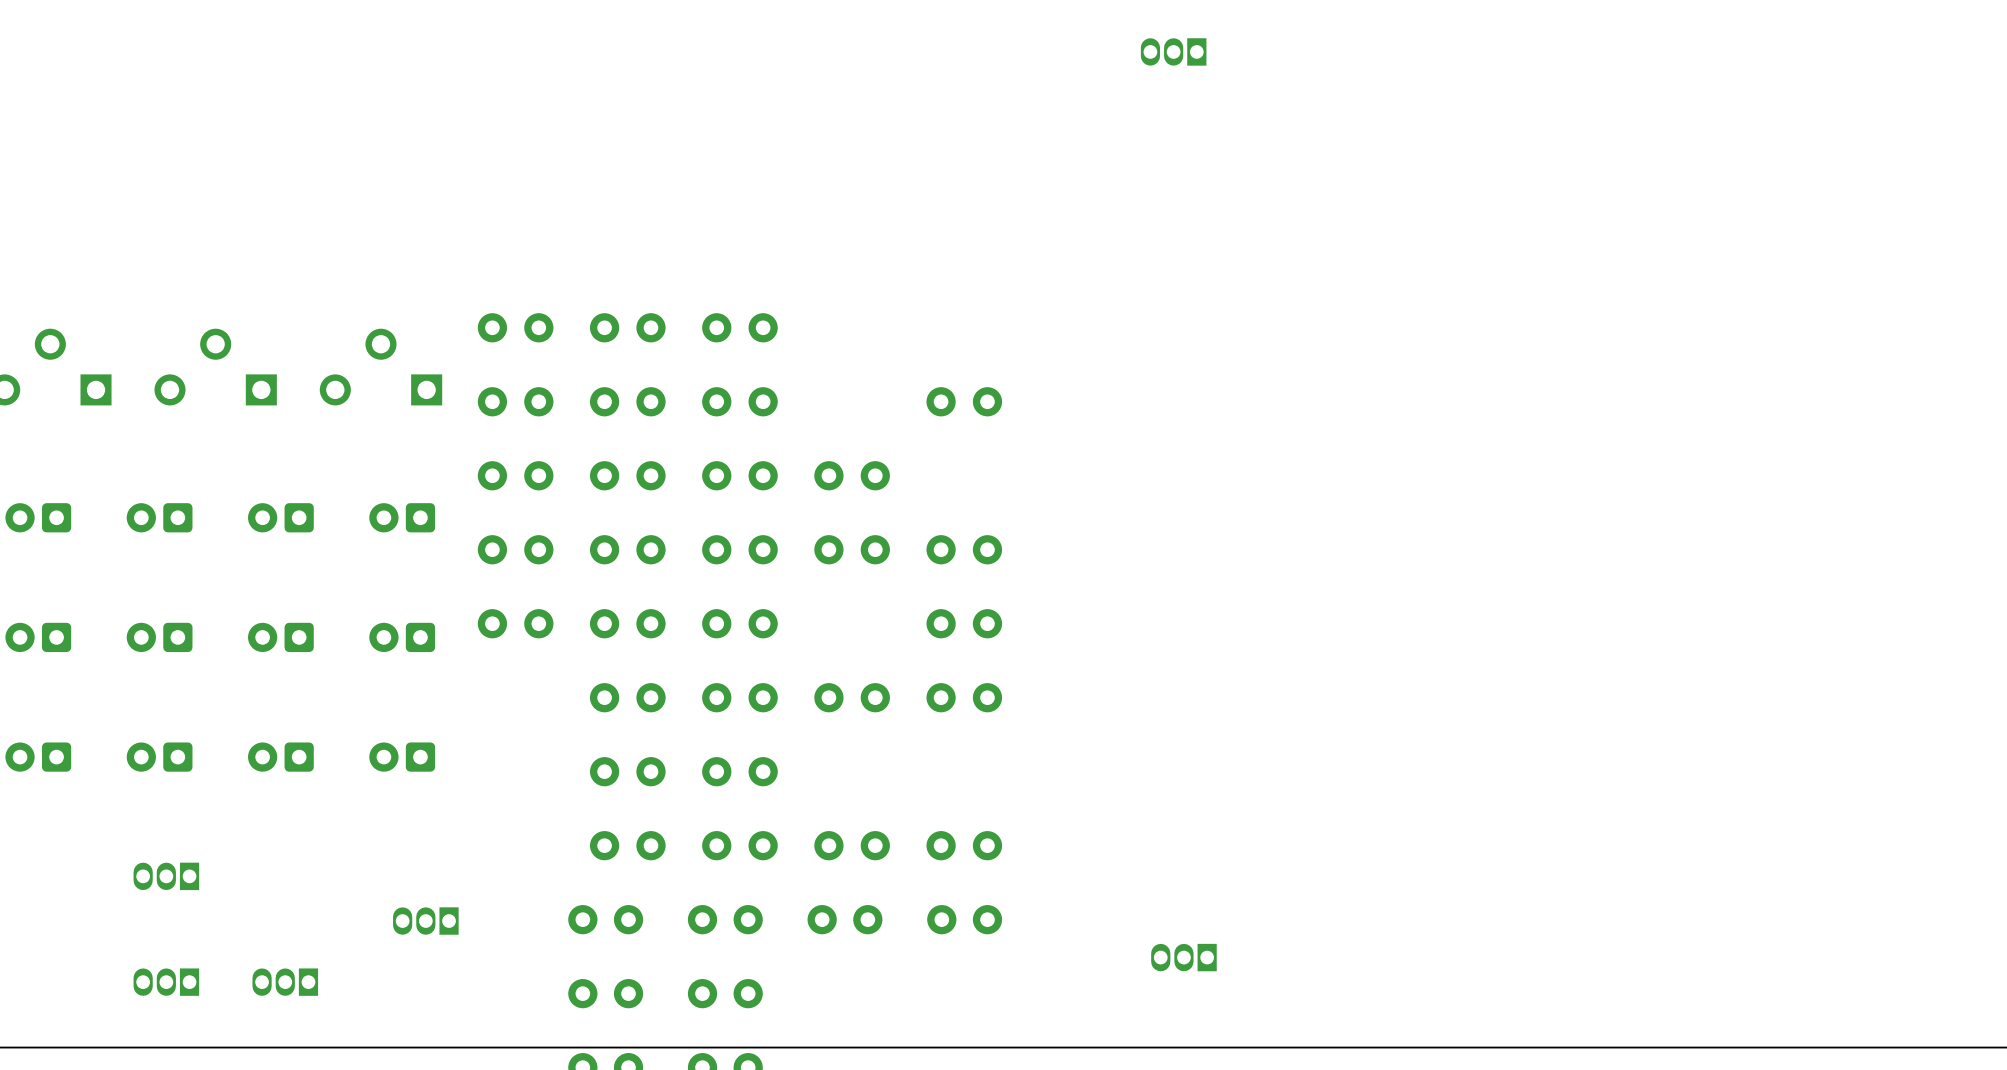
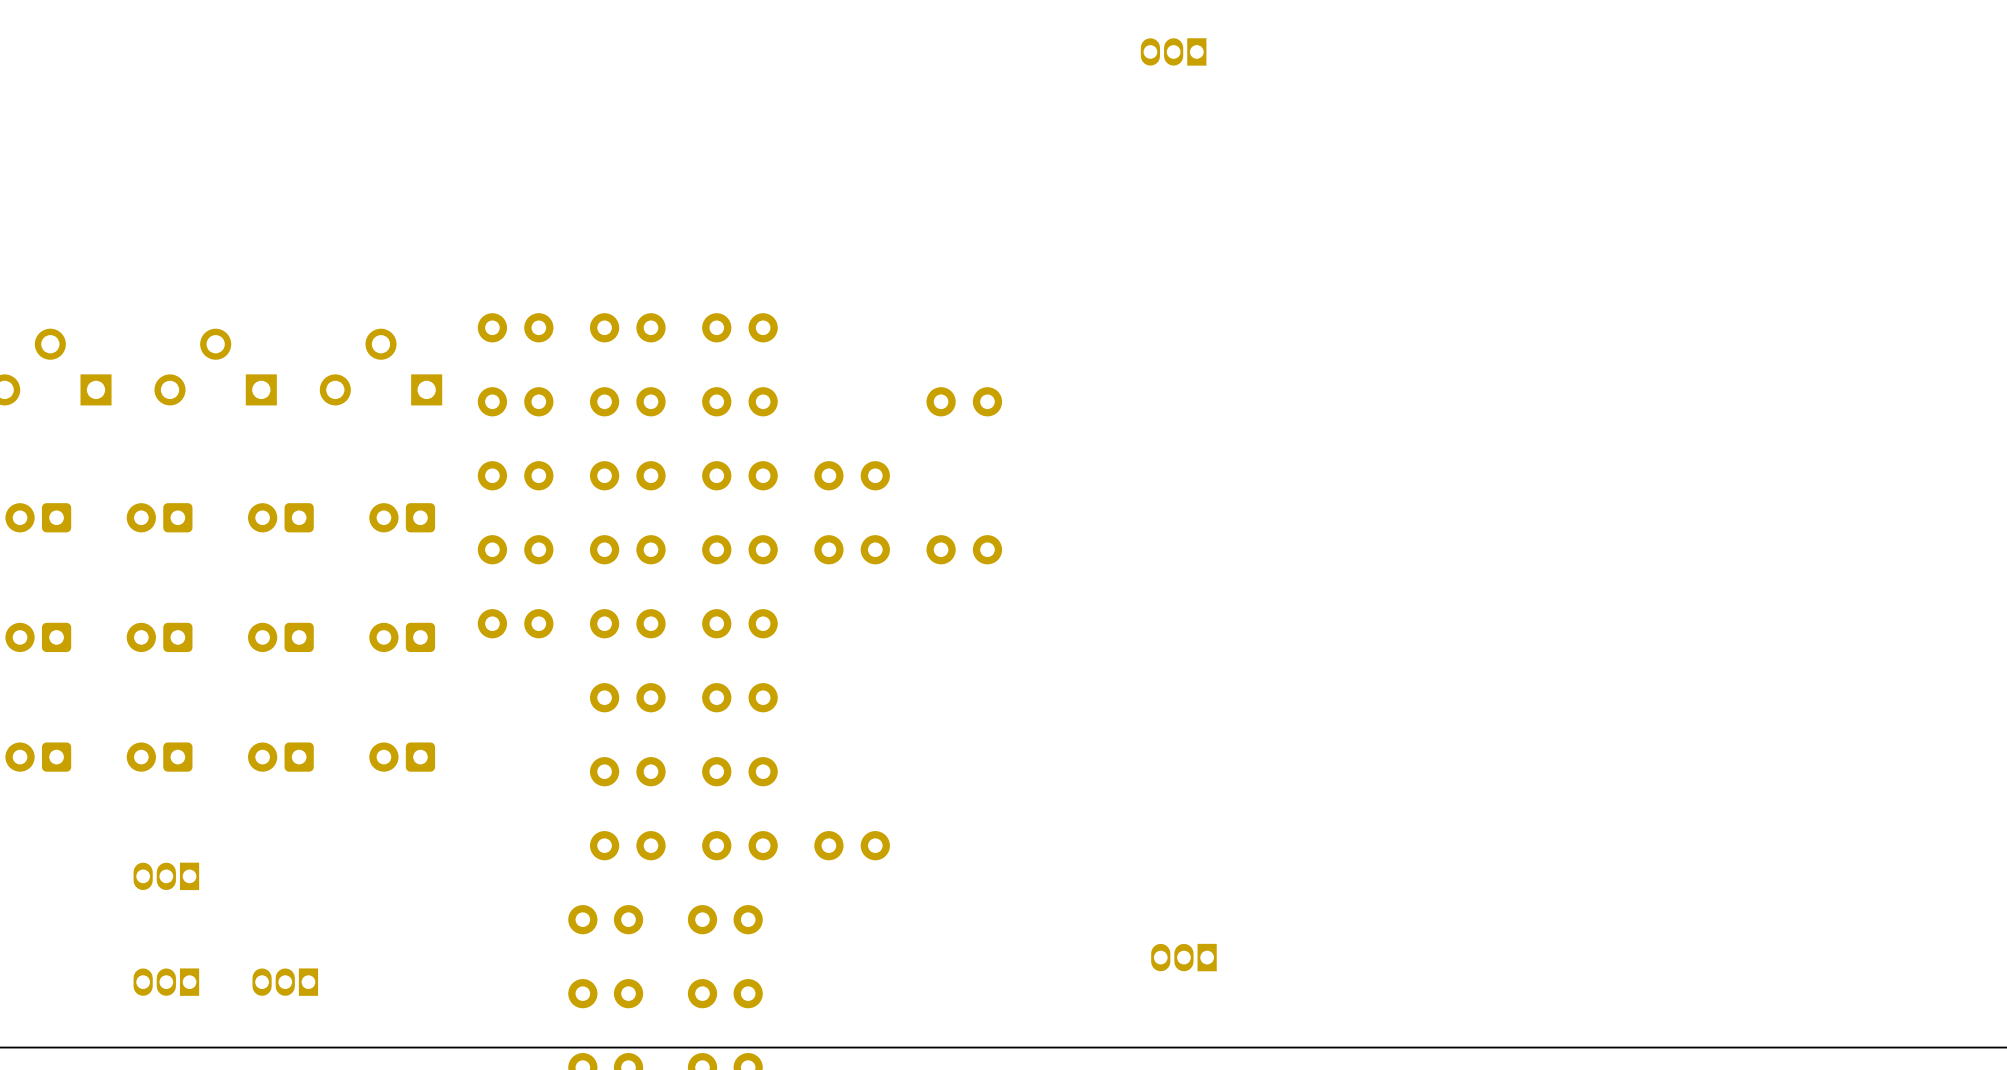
part: (964, 623) -> none
part: (852, 697) -> none
part: (964, 697) -> none
part: (964, 845) -> none
part: (844, 919) -> none
part: (964, 919) -> none
part: (425, 921) -> none

